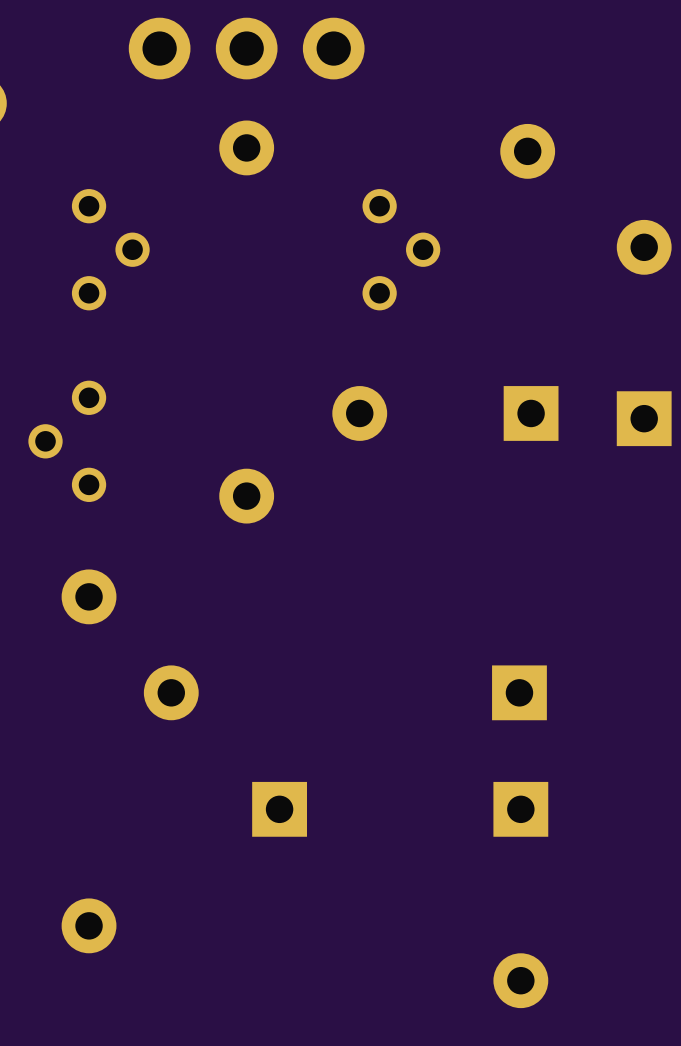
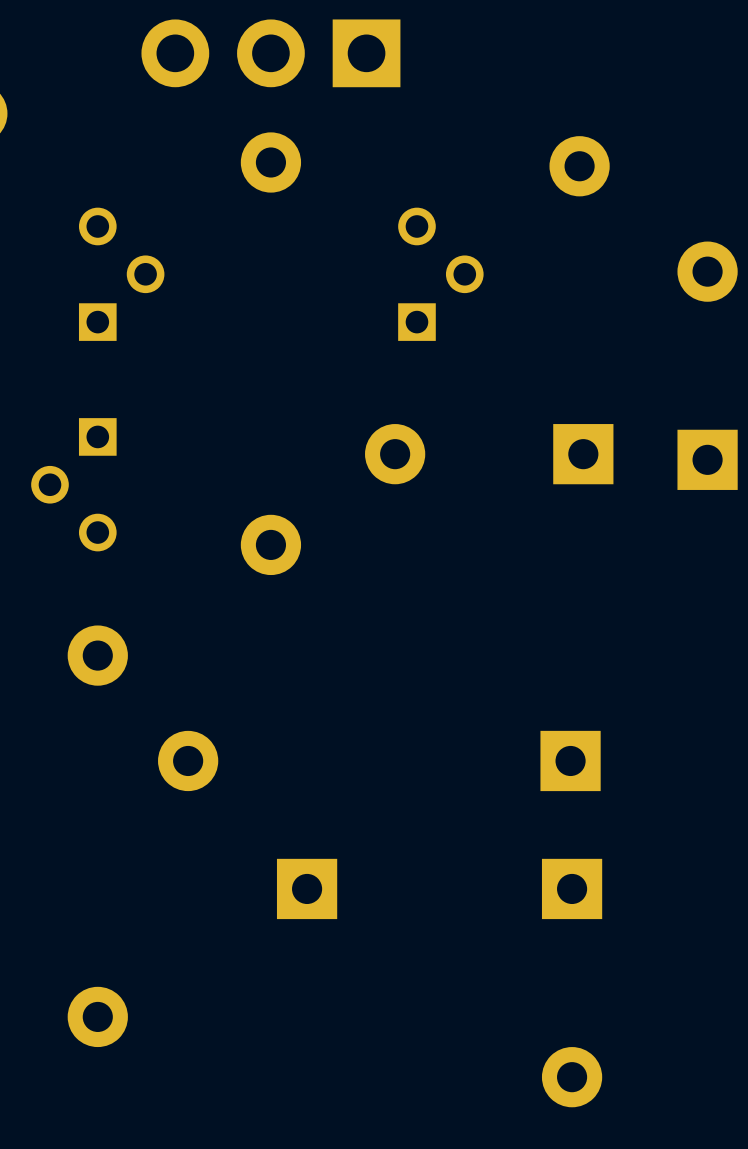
part footprint: [128, 17, 365, 80] -> [141, 19, 401, 88]
part footprint: [71, 189, 150, 311] -> [78, 207, 165, 341]
part footprint: [362, 189, 441, 311] -> [398, 207, 484, 341]
part footprint: [28, 380, 107, 502] -> [31, 418, 117, 552]

